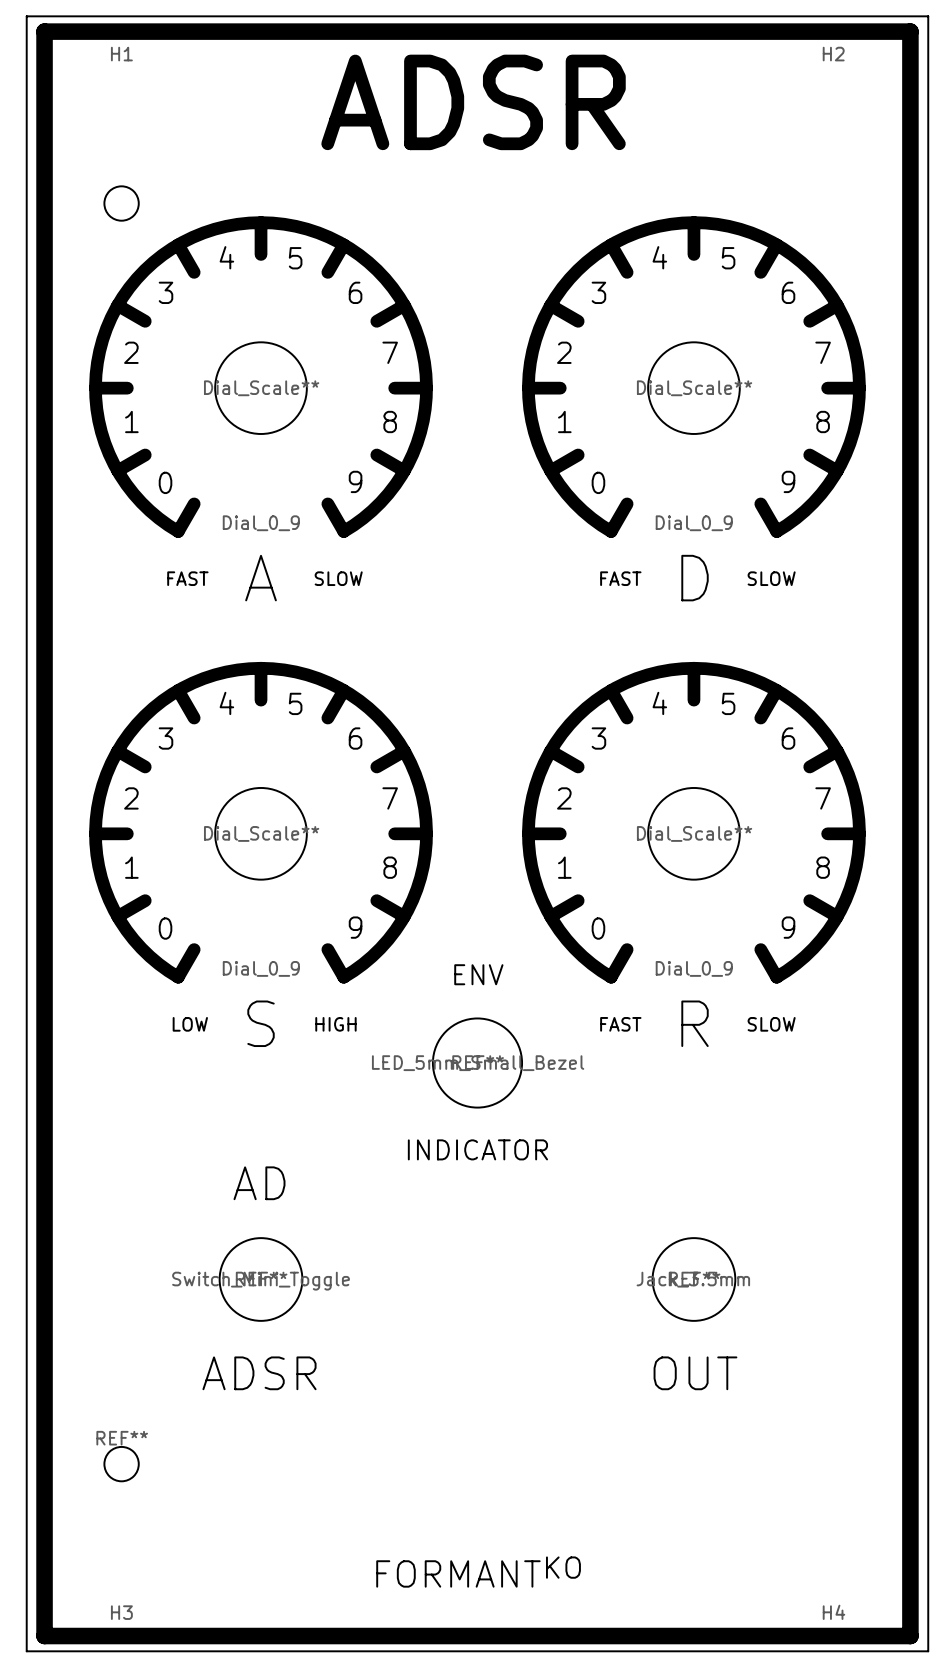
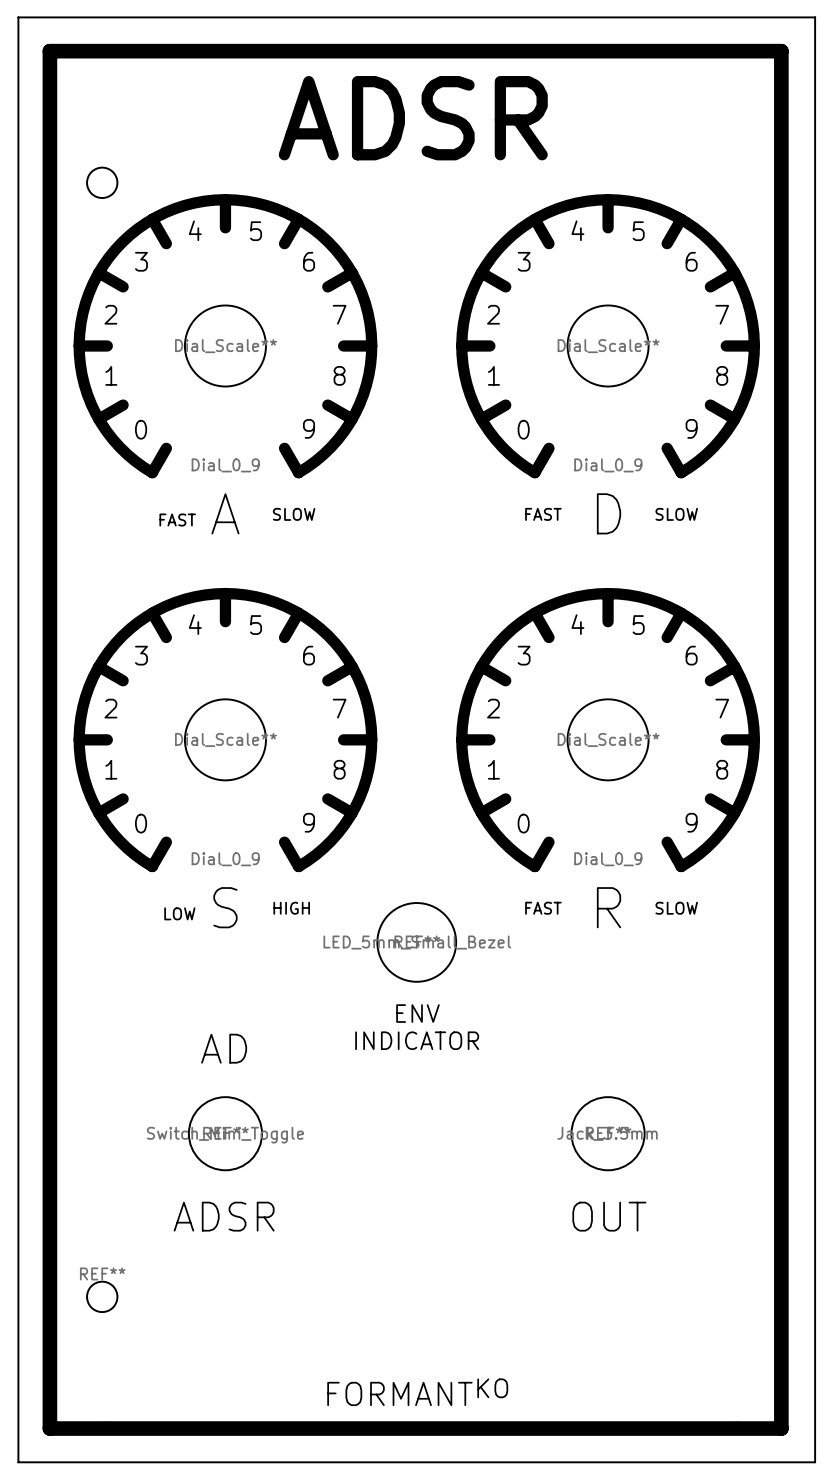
line: (44, 31) (910, 31) (910, 1636) (44, 1636) (44, 31) -> (49, 51) (49, 1428) (781, 1428) (781, 51) (49, 51)
text position: ADSR (473, 102) -> ADSR (413, 118)
text position: FAST (187, 578) -> FAST (177, 520)
text position: ENV (478, 974) -> ENV (417, 1013)
text position: LOW (190, 1024) -> LOW (179, 913)
text position: INDICATOR (477, 1149) -> INDICATOR (417, 1040)

